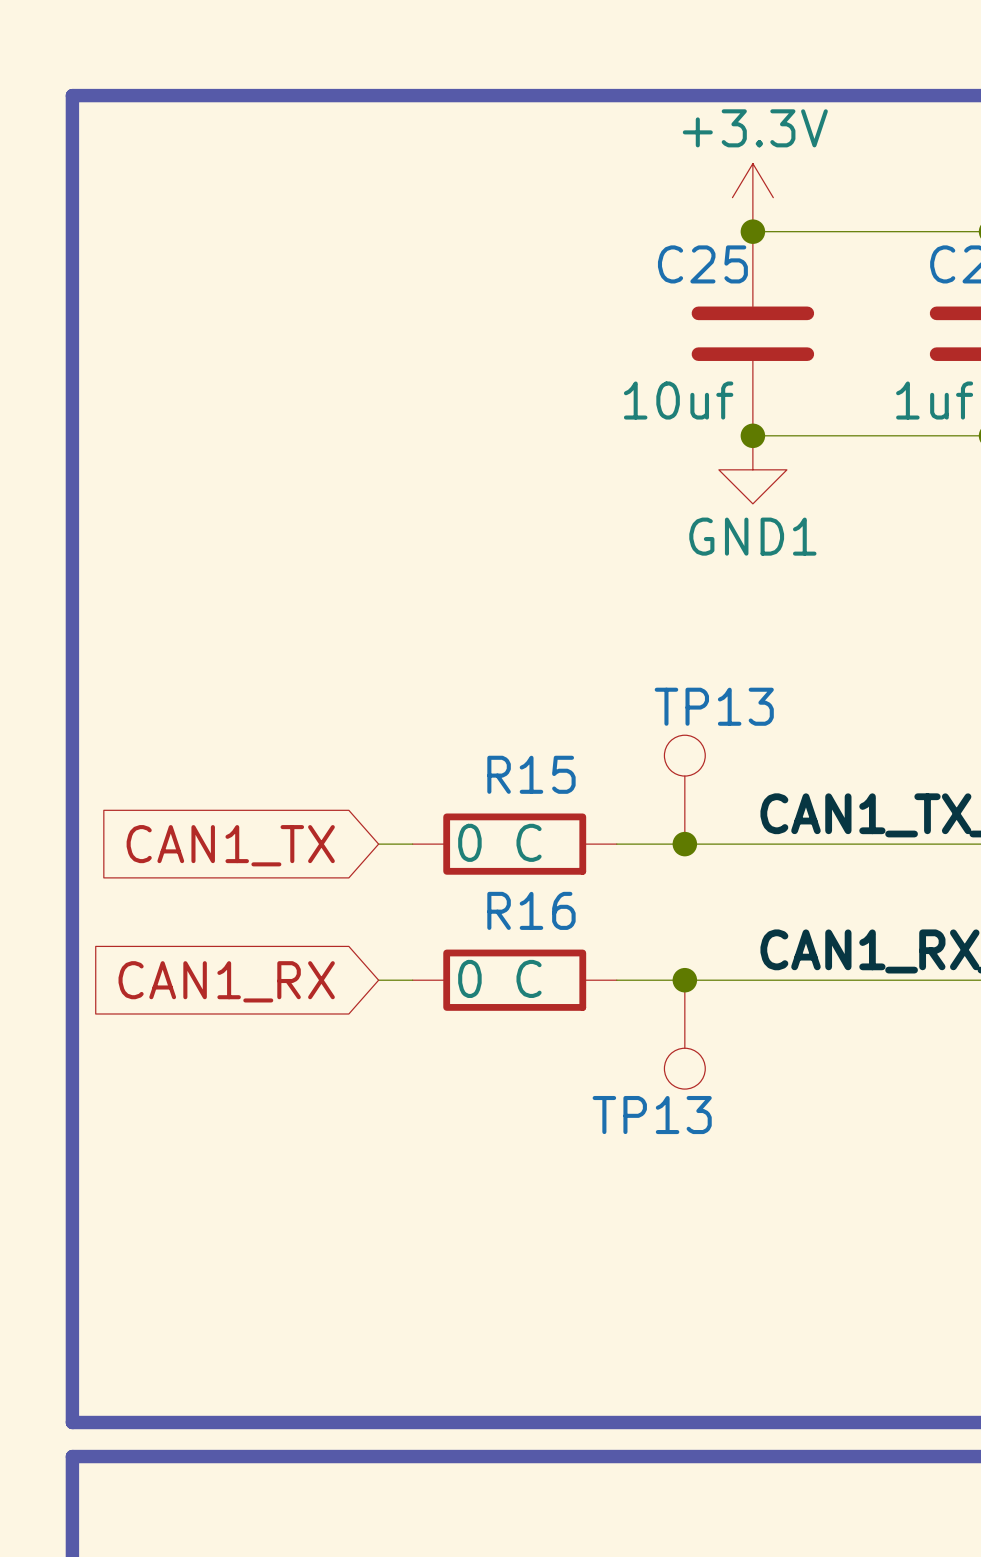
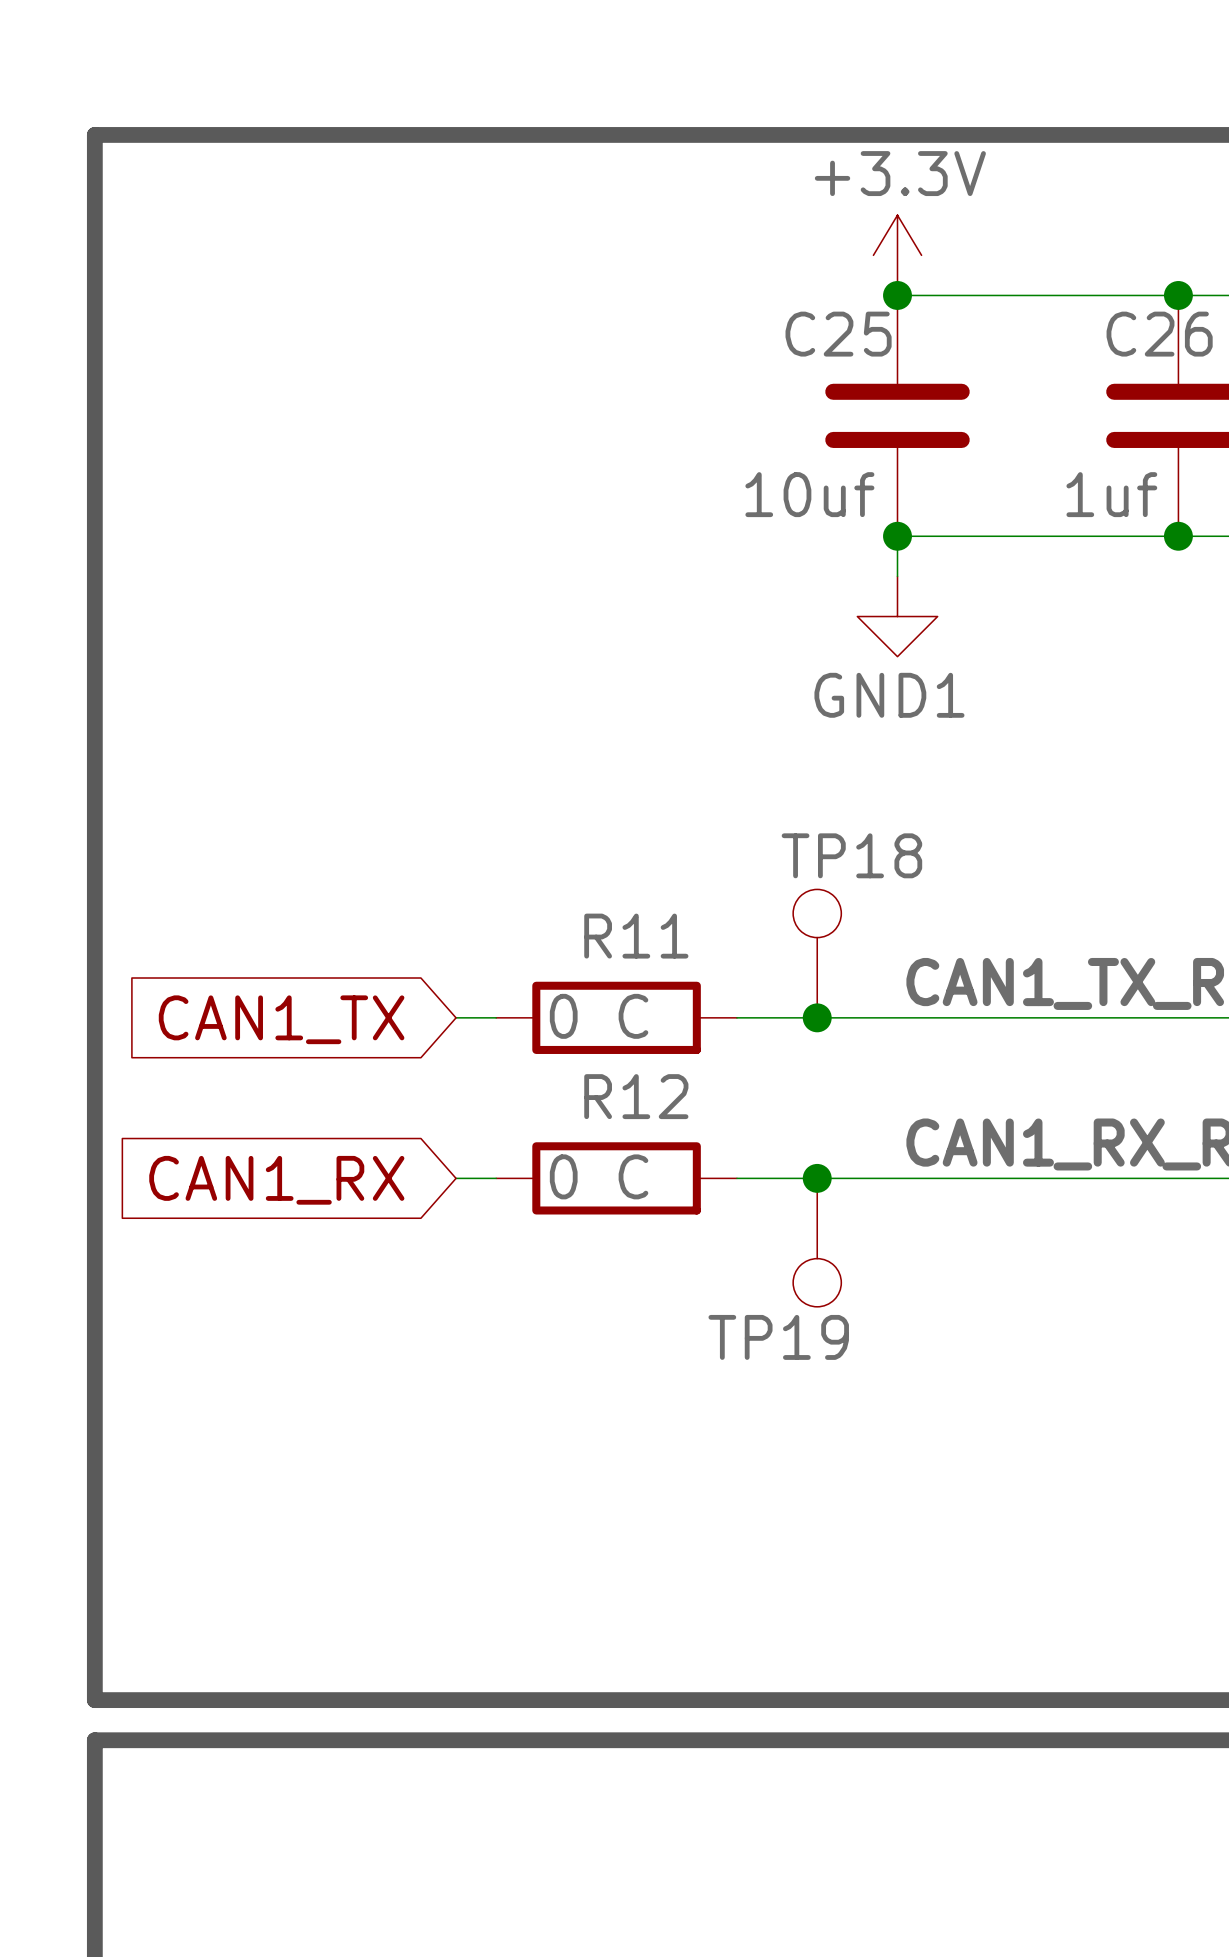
power symbol position: GND1 (752, 469) -> GND1 (897, 616)
power symbol text position: GND1 (752, 536) -> GND1 (889, 695)
TP13 name: TP13 (714, 706) -> TP18 (851, 855)
R15 name: R15 (531, 774) -> R11 (636, 936)
R16 name: R16 (531, 910) -> R12 (636, 1096)
TP13 name: TP13 (652, 1115) -> TP19 (778, 1337)

